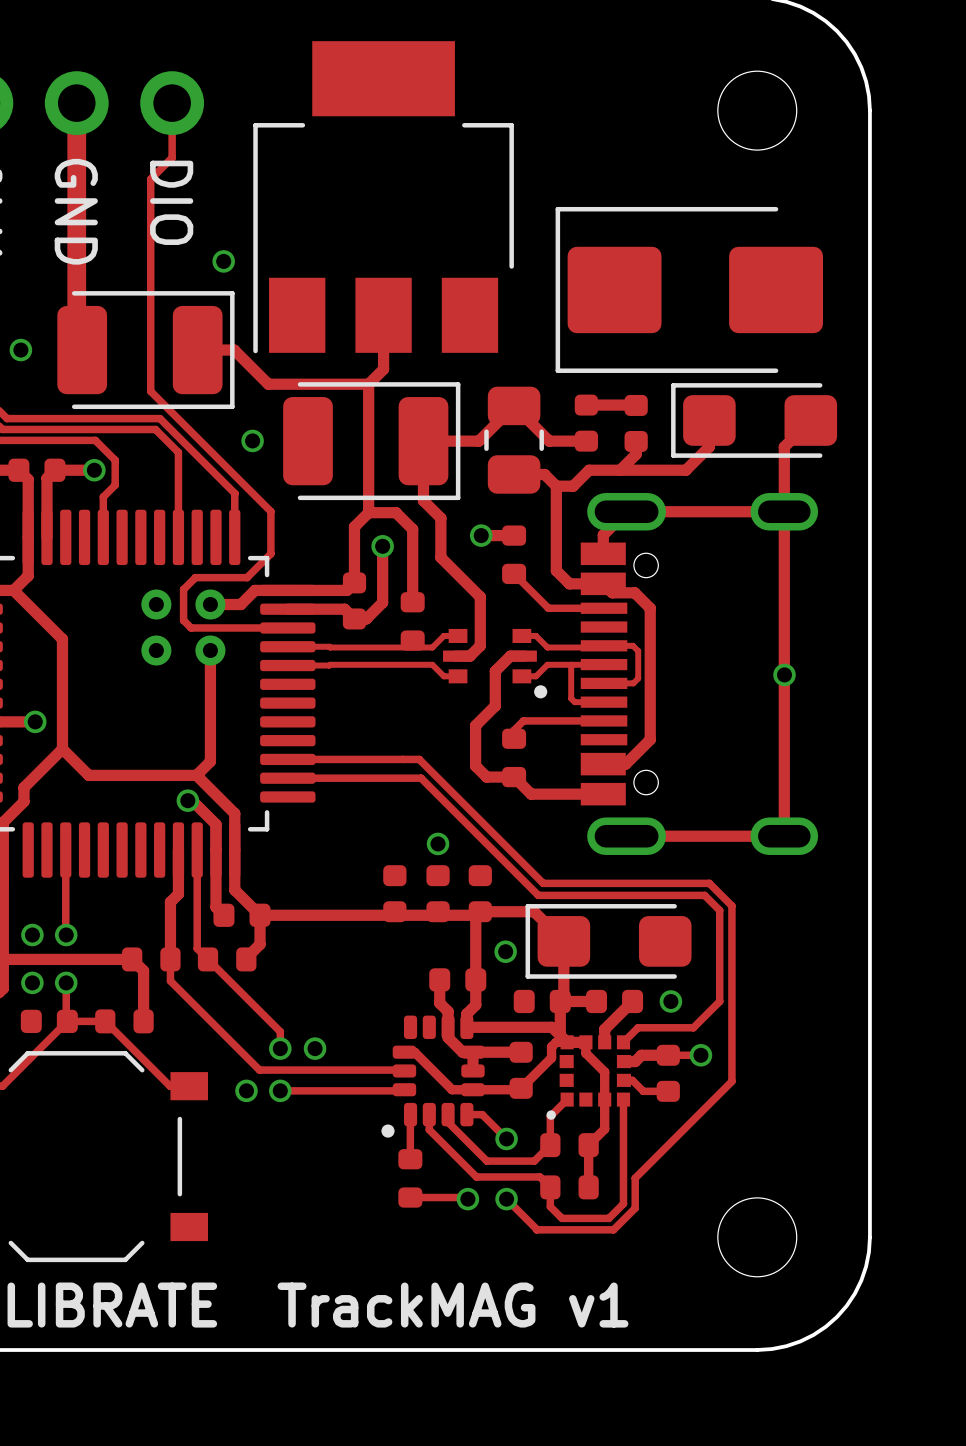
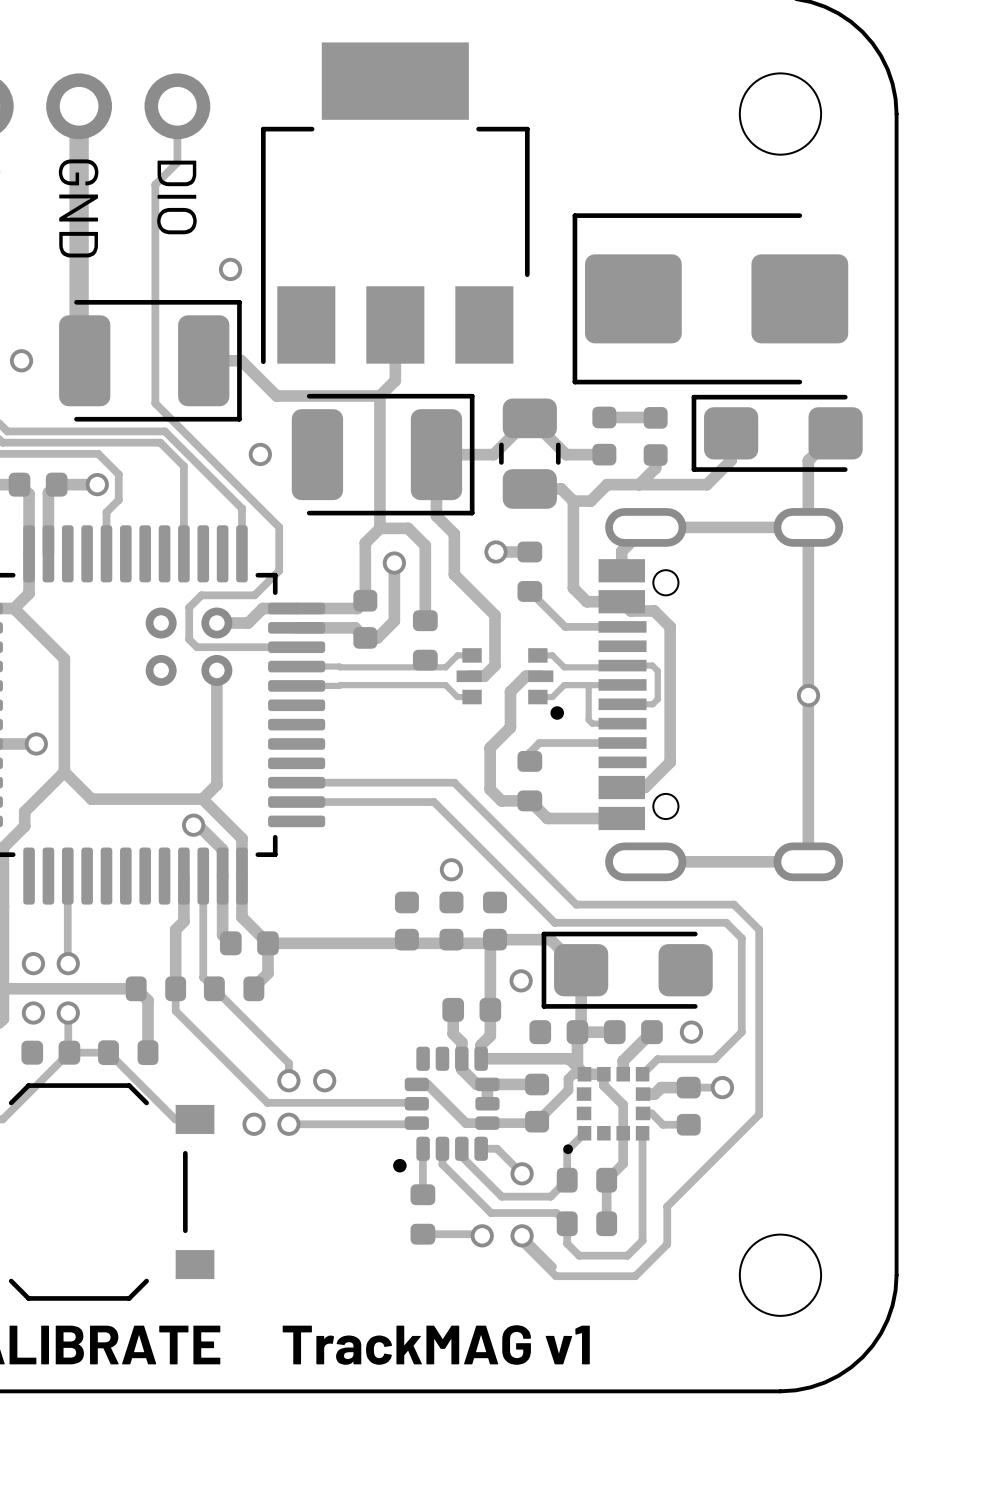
track: (419, 759) (543, 883) (709, 883) (731, 905) (731, 1081) (635, 1178) (635, 1208) (613, 1229) (536, 1229) -> (432, 782) (454, 782) (576, 904) (734, 904) (759, 929) (759, 1114) (667, 1206) (667, 1244) (635, 1276) (555, 1276) (522, 1242) (522, 1235)

